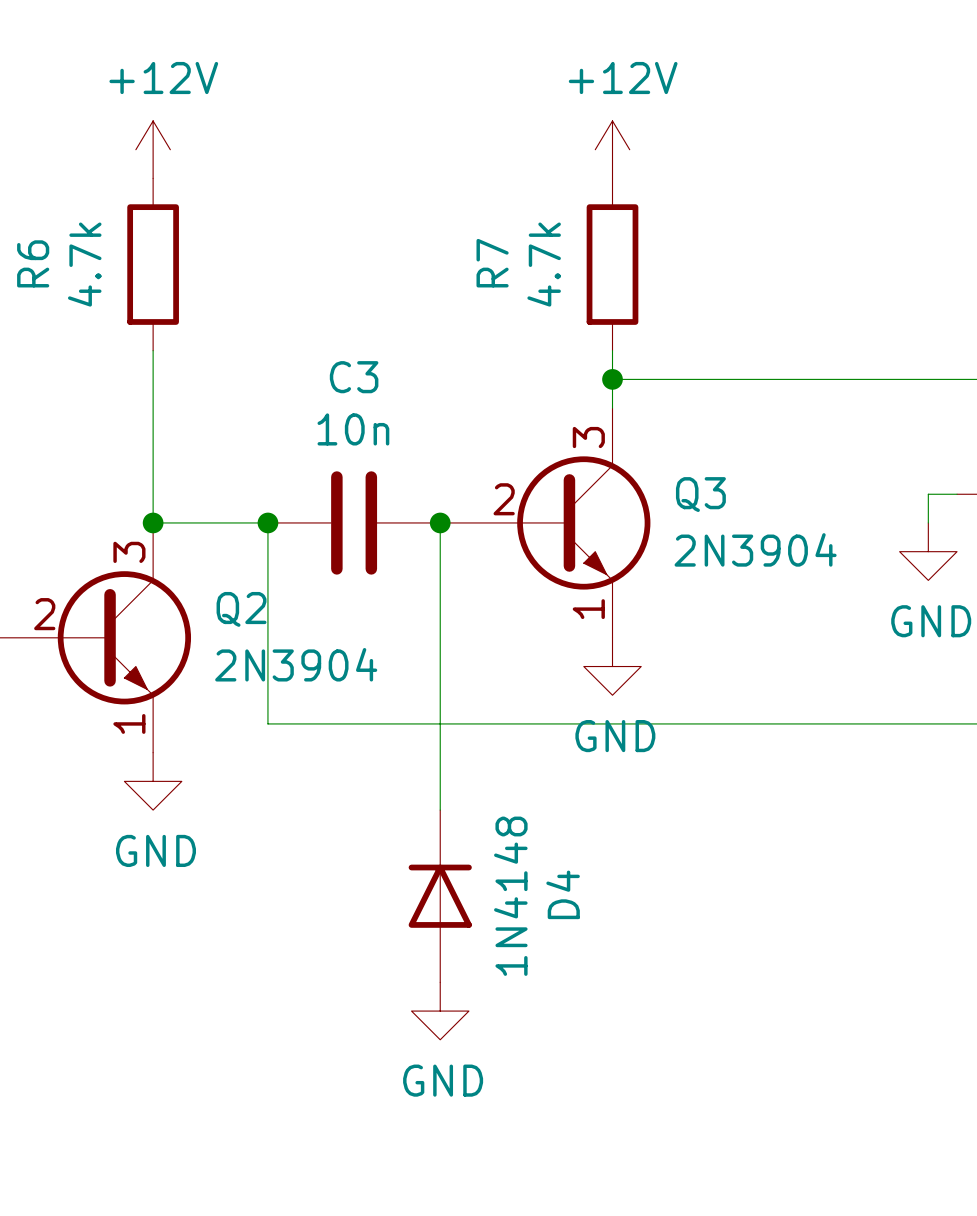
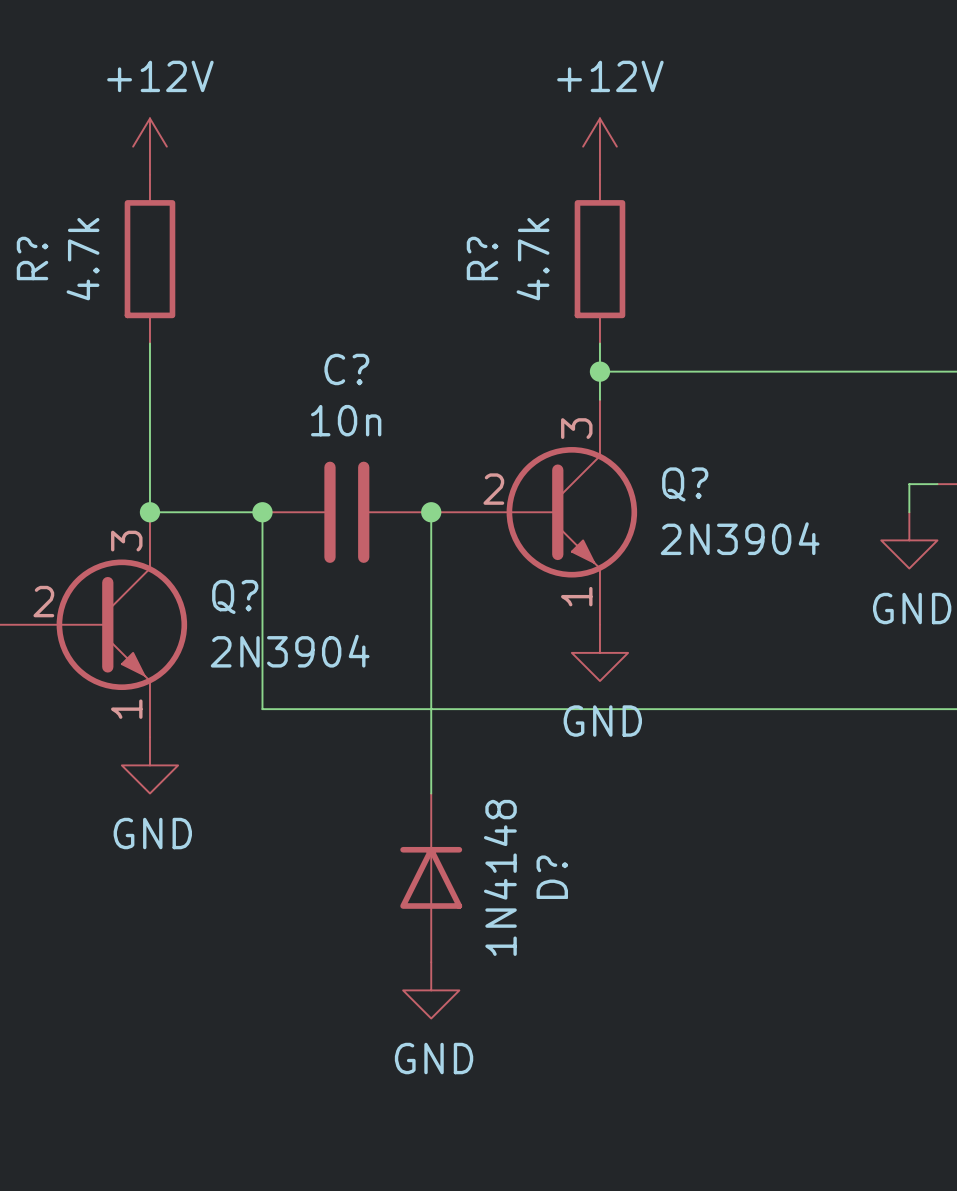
R6 name: R6 (33, 263) -> R? (32, 258)
R7 name: R7 (492, 263) -> R? (482, 258)
C3 name: C3 (354, 377) -> C? (346, 369)
Q3 name: Q3 (700, 494) -> Q? (685, 484)
Q2 name: Q2 (241, 609) -> Q? (235, 596)
D4 name: D4 (563, 894) -> D? (552, 877)

